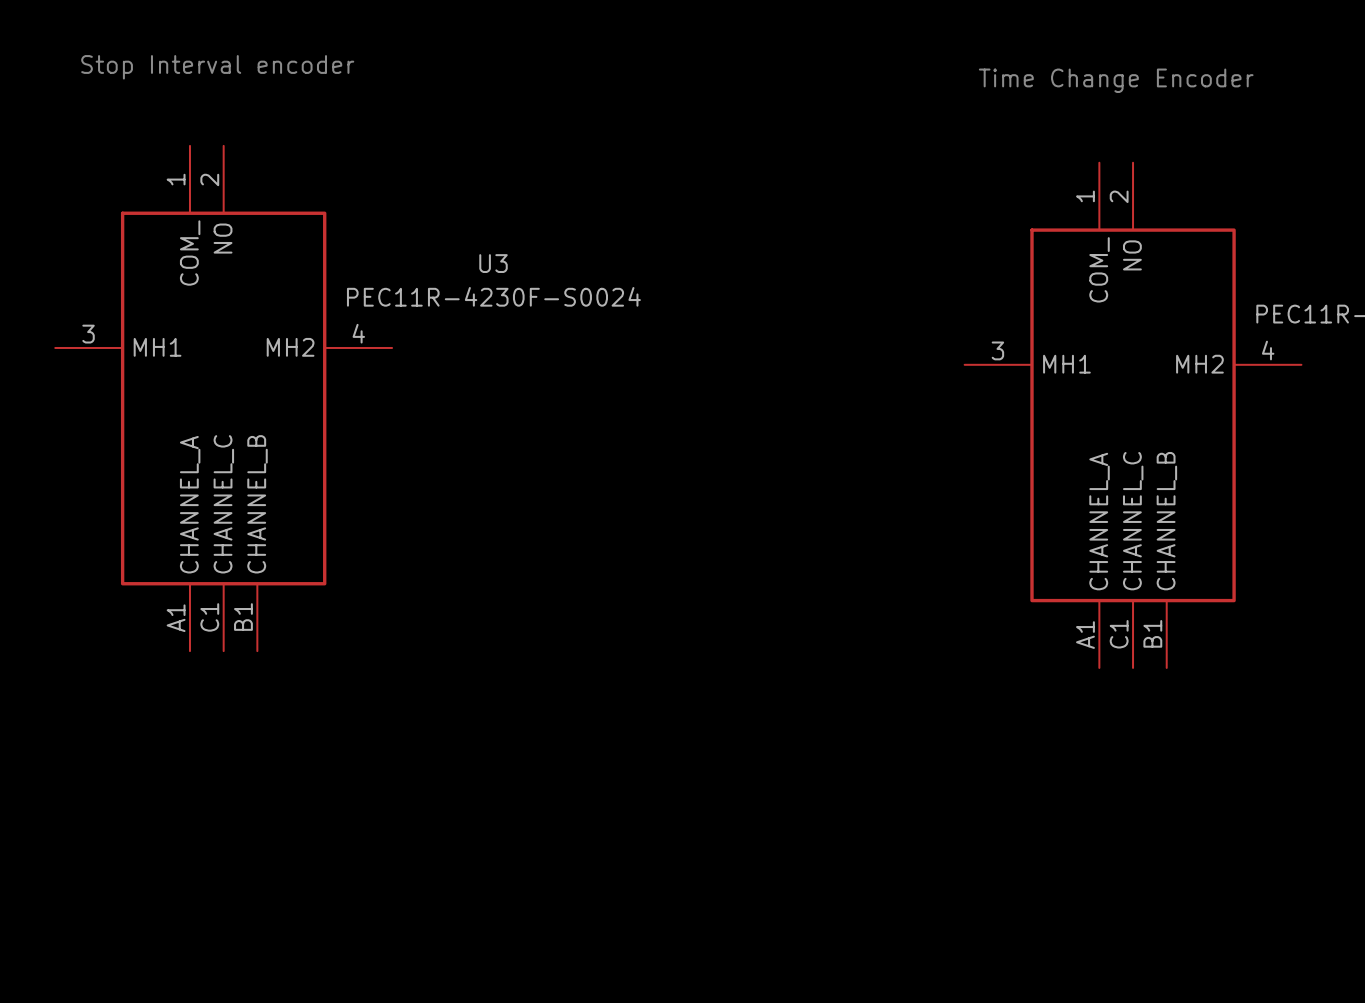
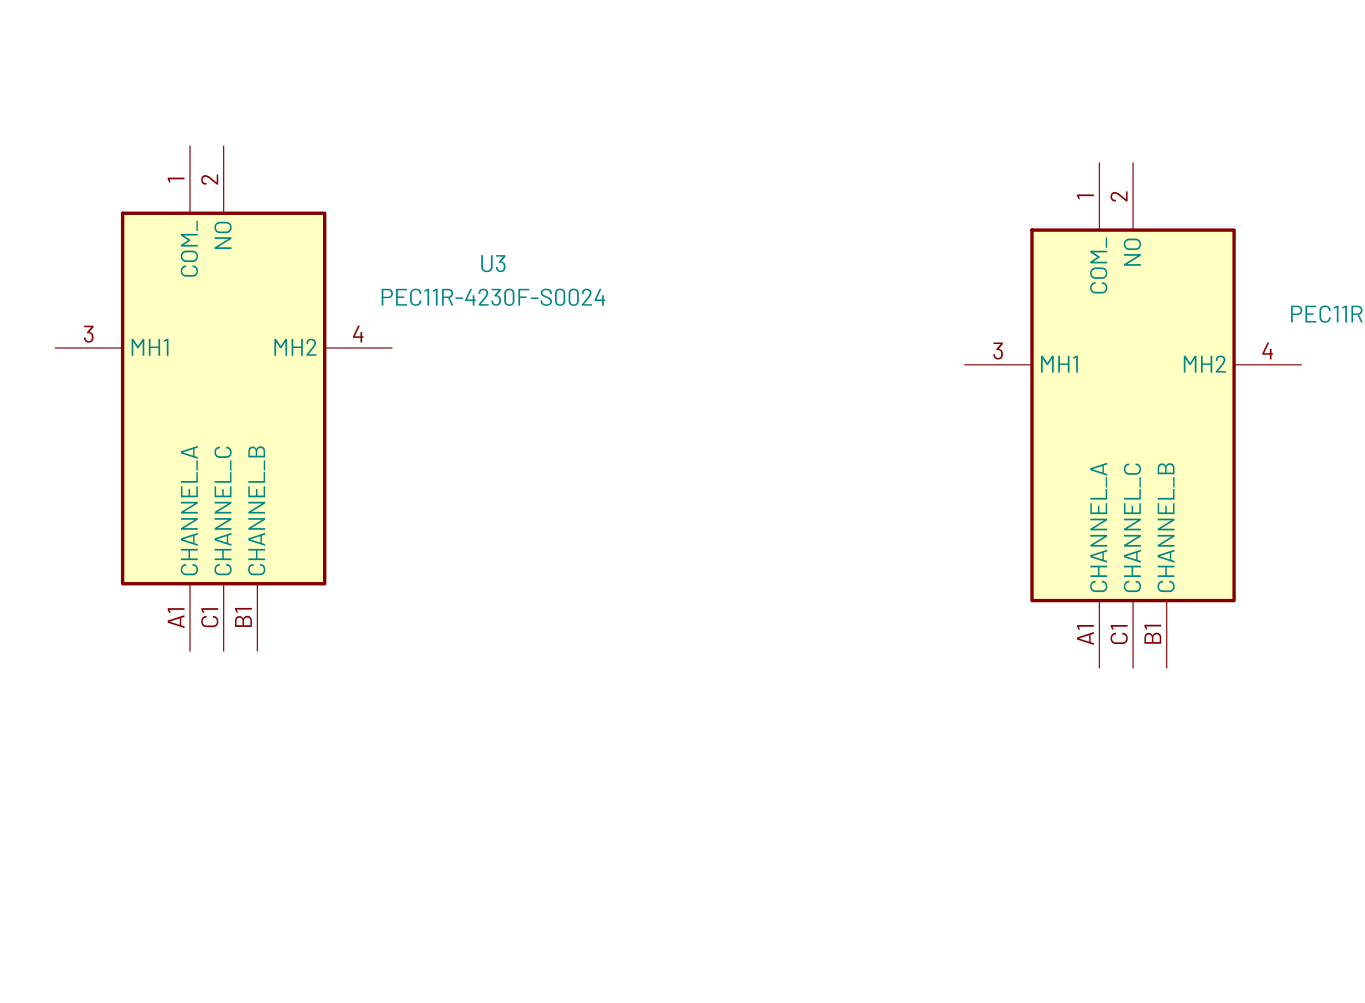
text: Stop Interval encoder (217, 67) -> none
text: Time Change Encoder (1116, 80) -> none

